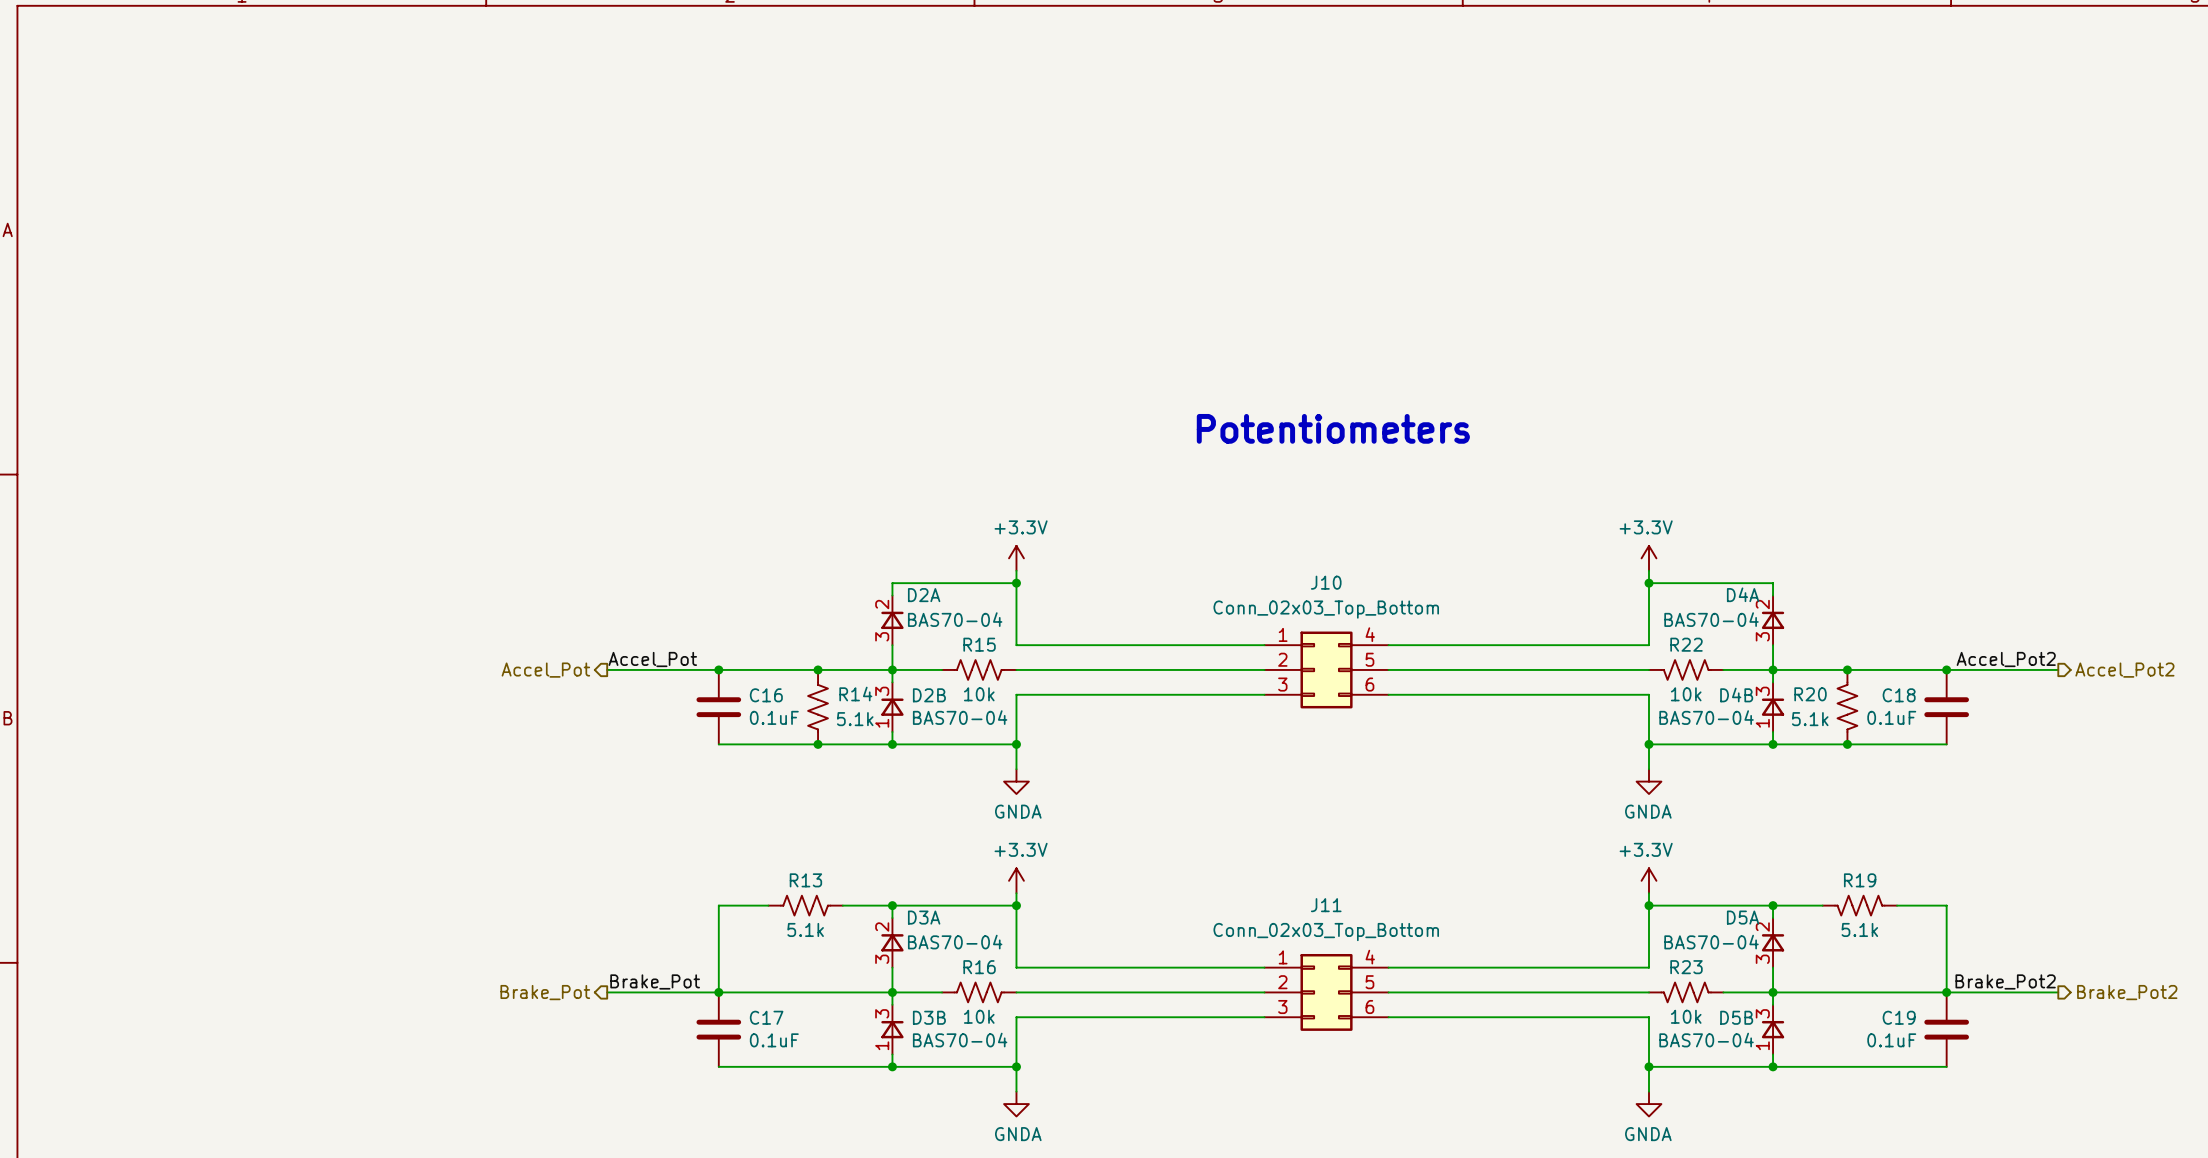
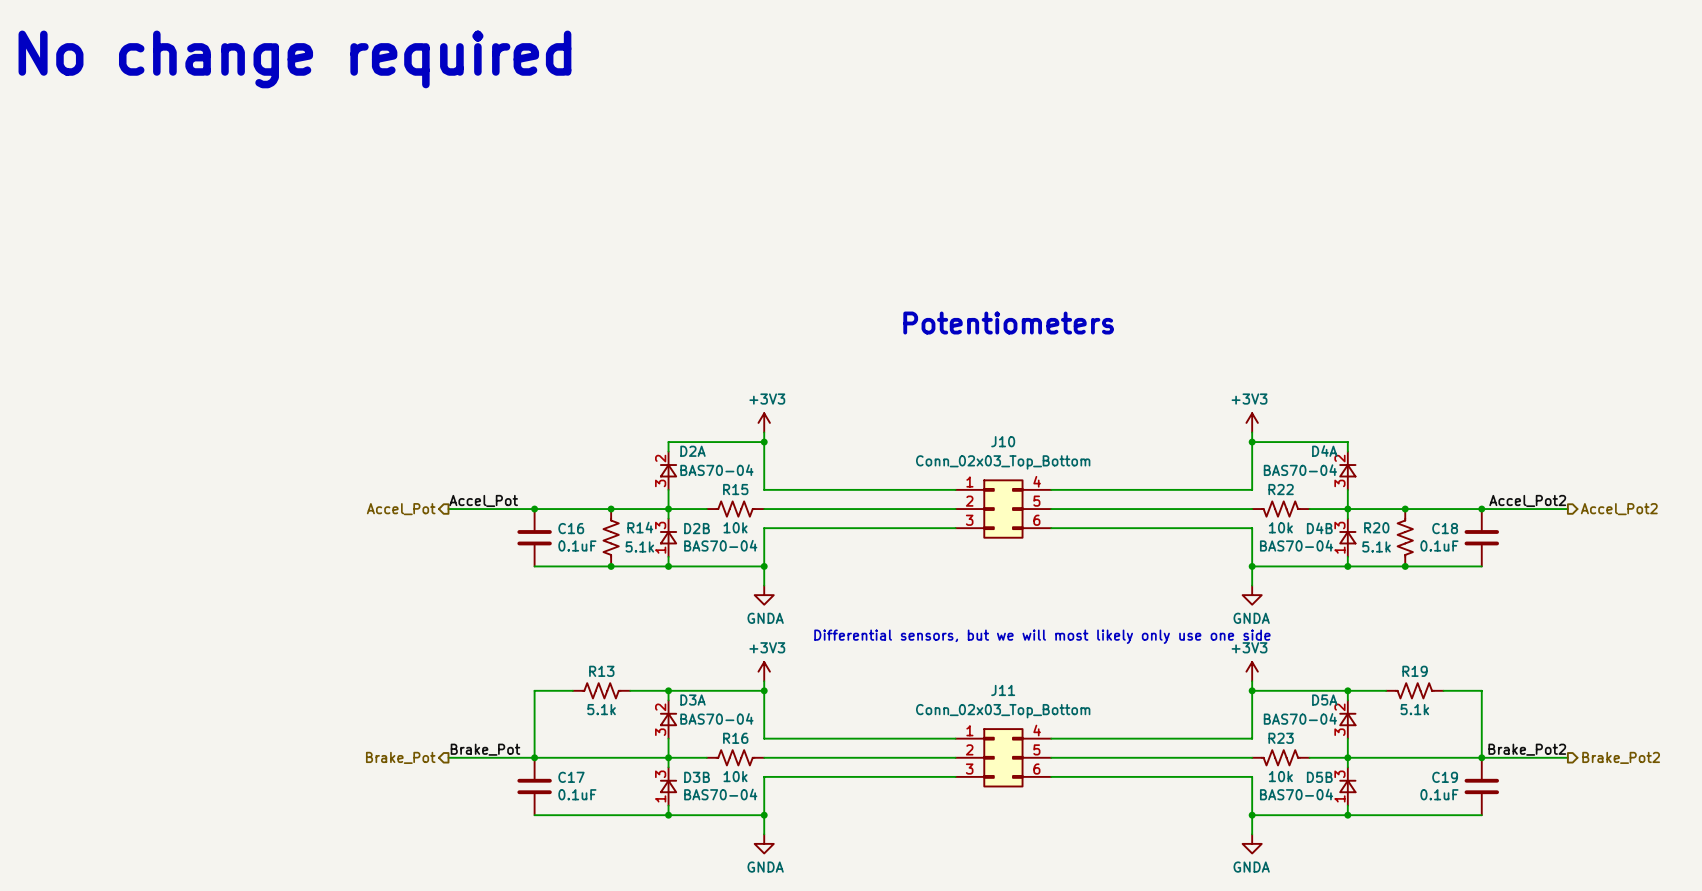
text: none -> No change required (294, 59)
power symbol: +3.3V (1016, 558) -> +3V3 (764, 422)
power symbol: +3.3V (1649, 558) -> +3V3 (1252, 422)
text: none -> Differential sensors, but we will most likely only use one side (1042, 636)
power symbol: +3.3V (1016, 880) -> +3V3 (764, 671)
power symbol: +3.3V (1649, 880) -> +3V3 (1252, 671)

